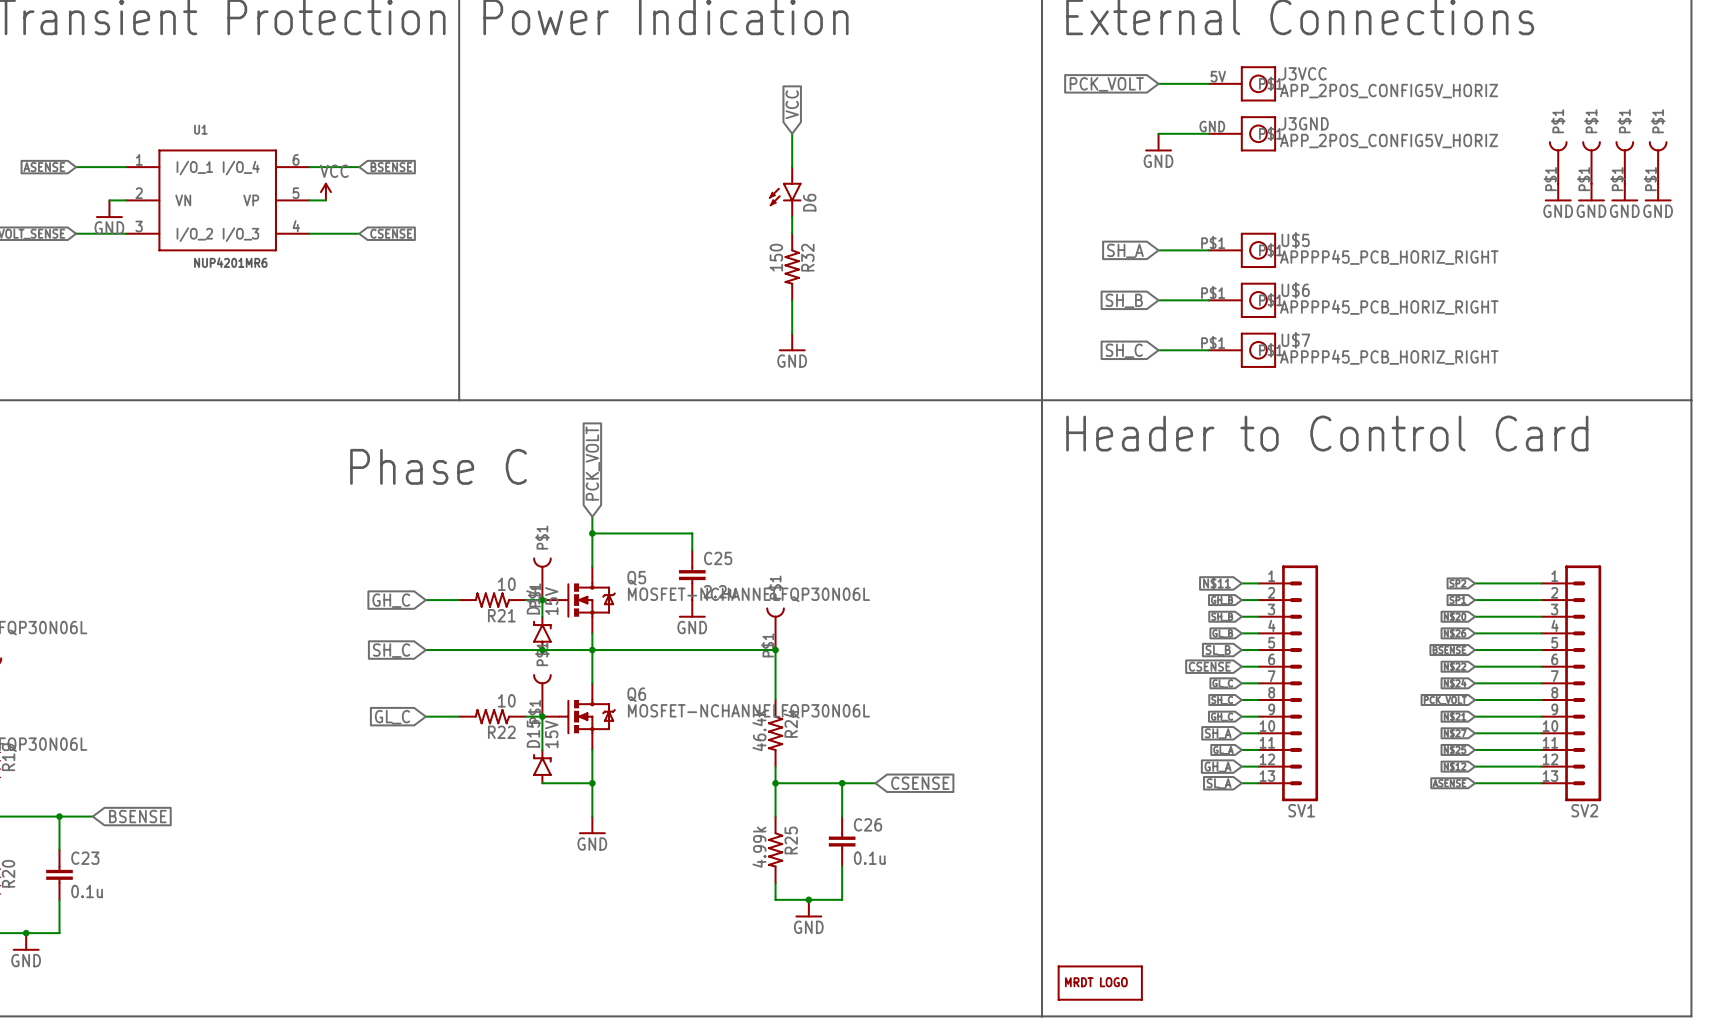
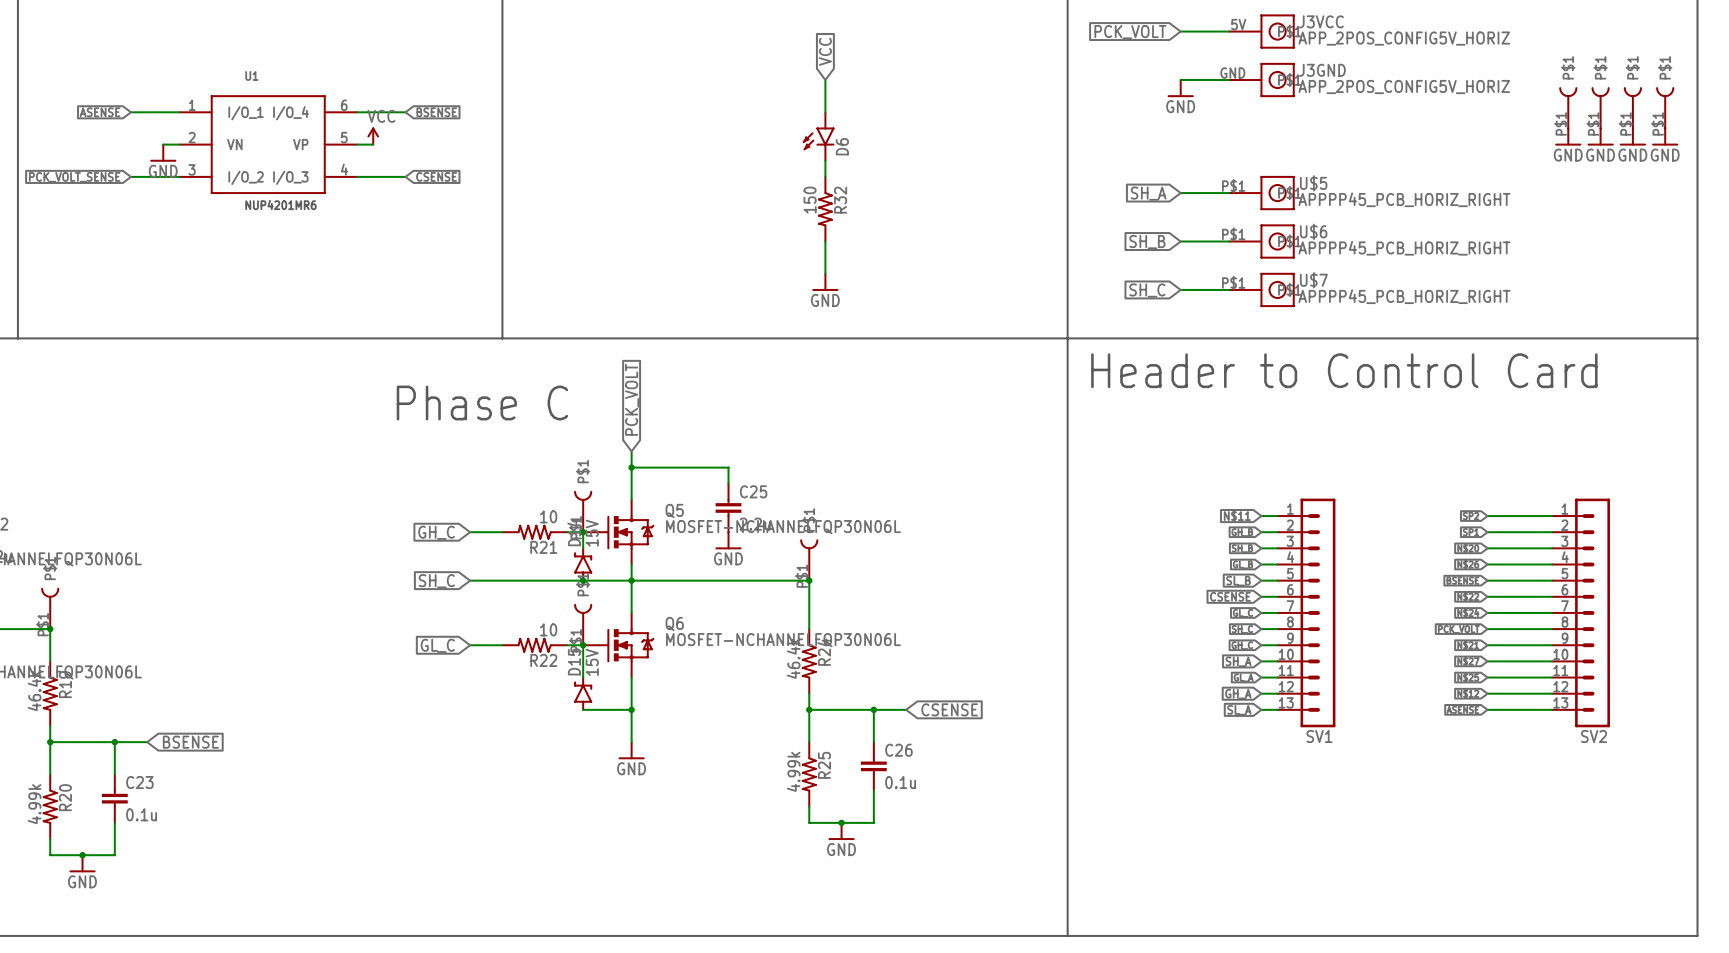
part: (1100, 983) -> none

